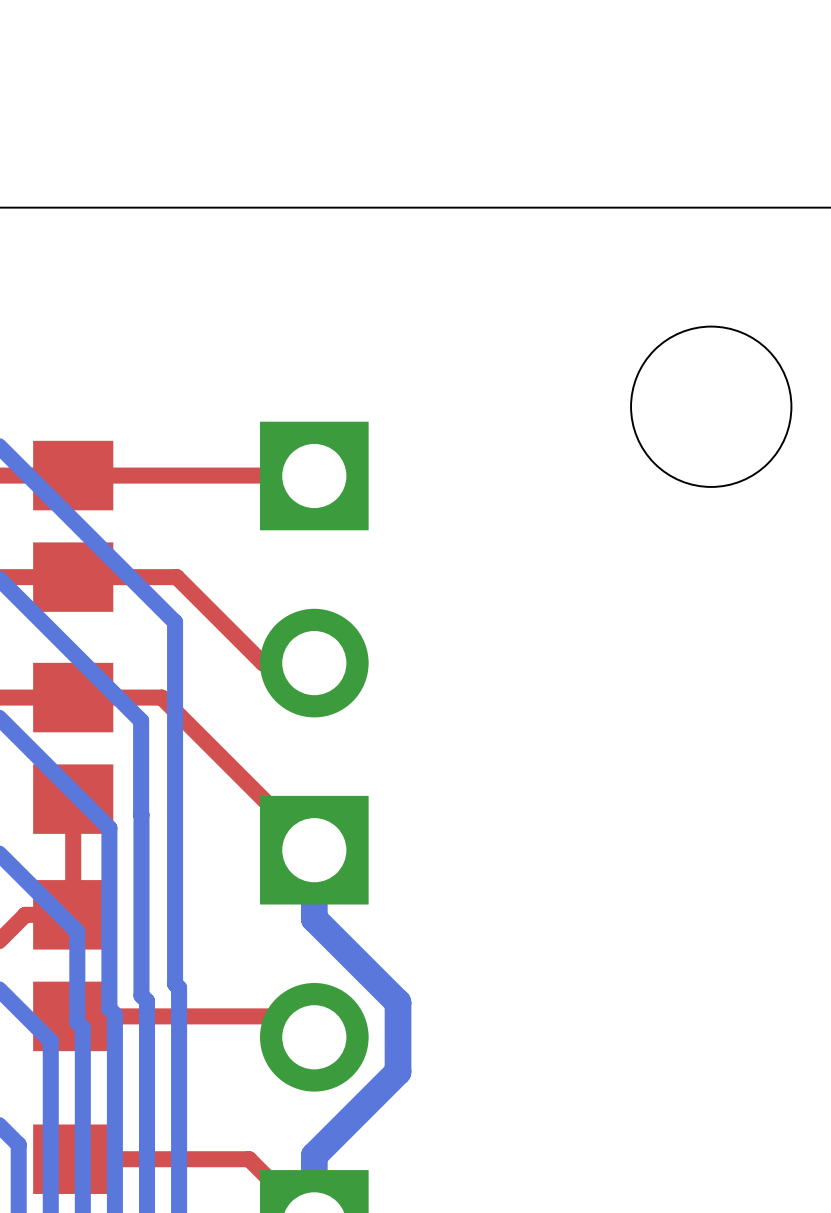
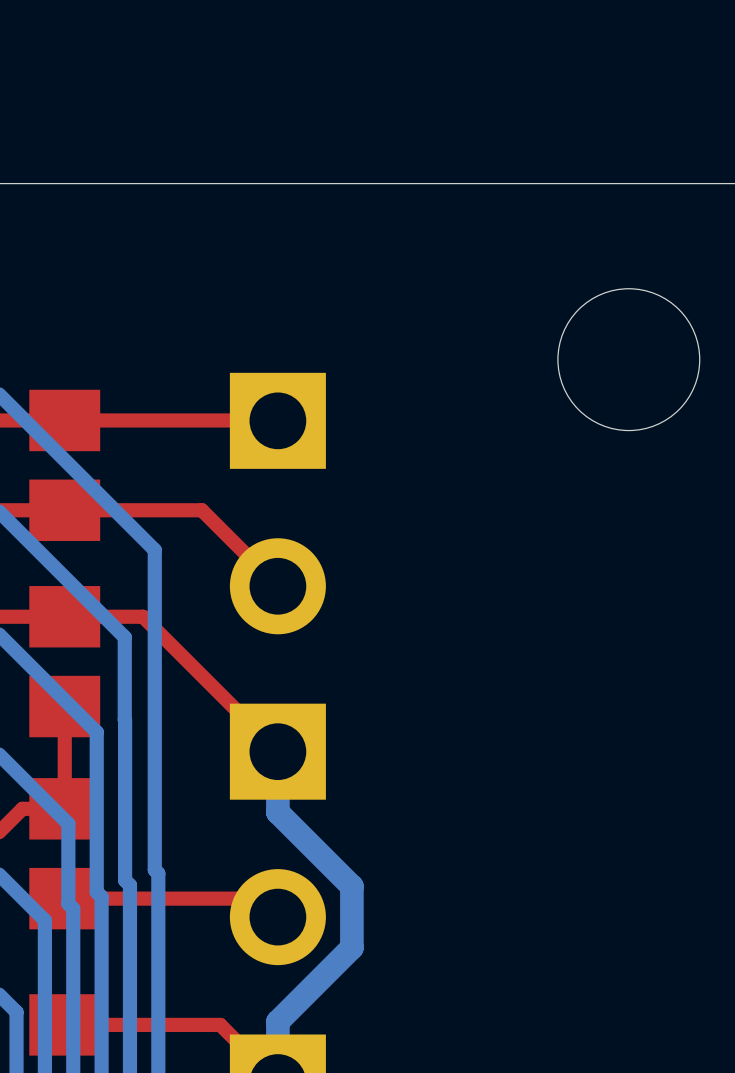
top track: (176, 577) (262, 663) (314, 663) -> (156, 510) (201, 510) (277, 586)

